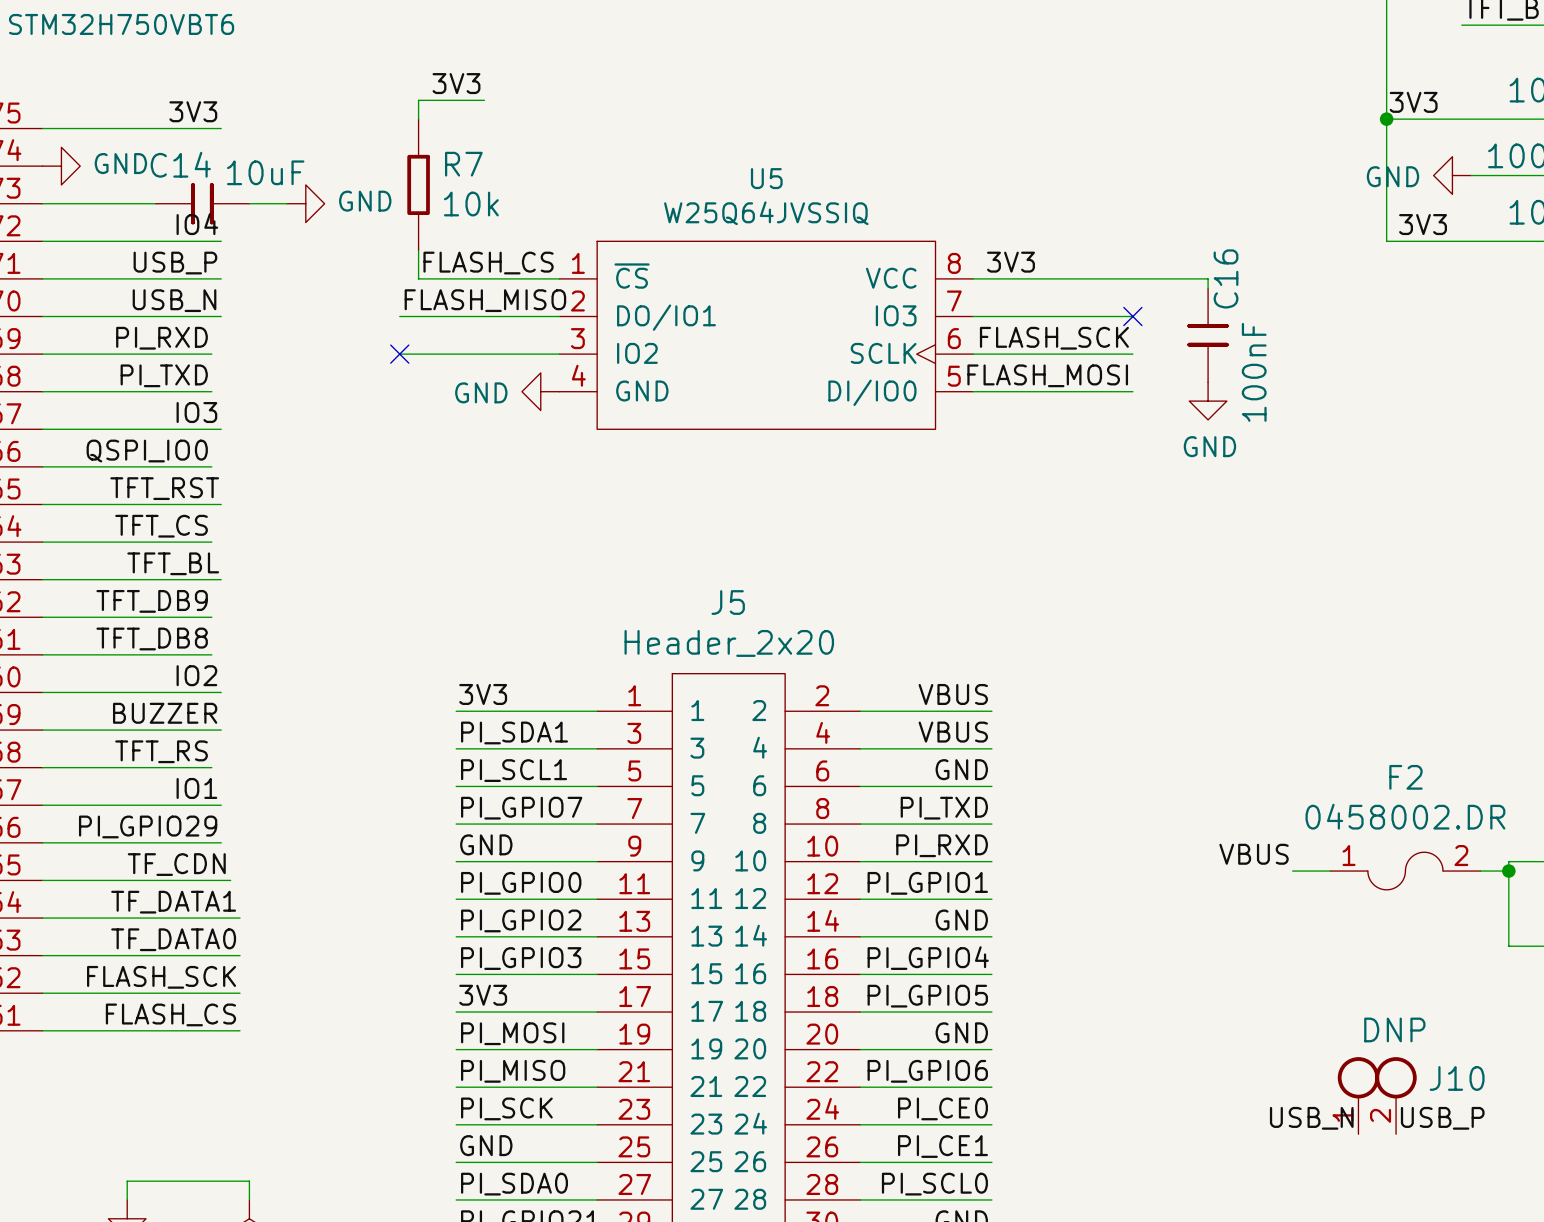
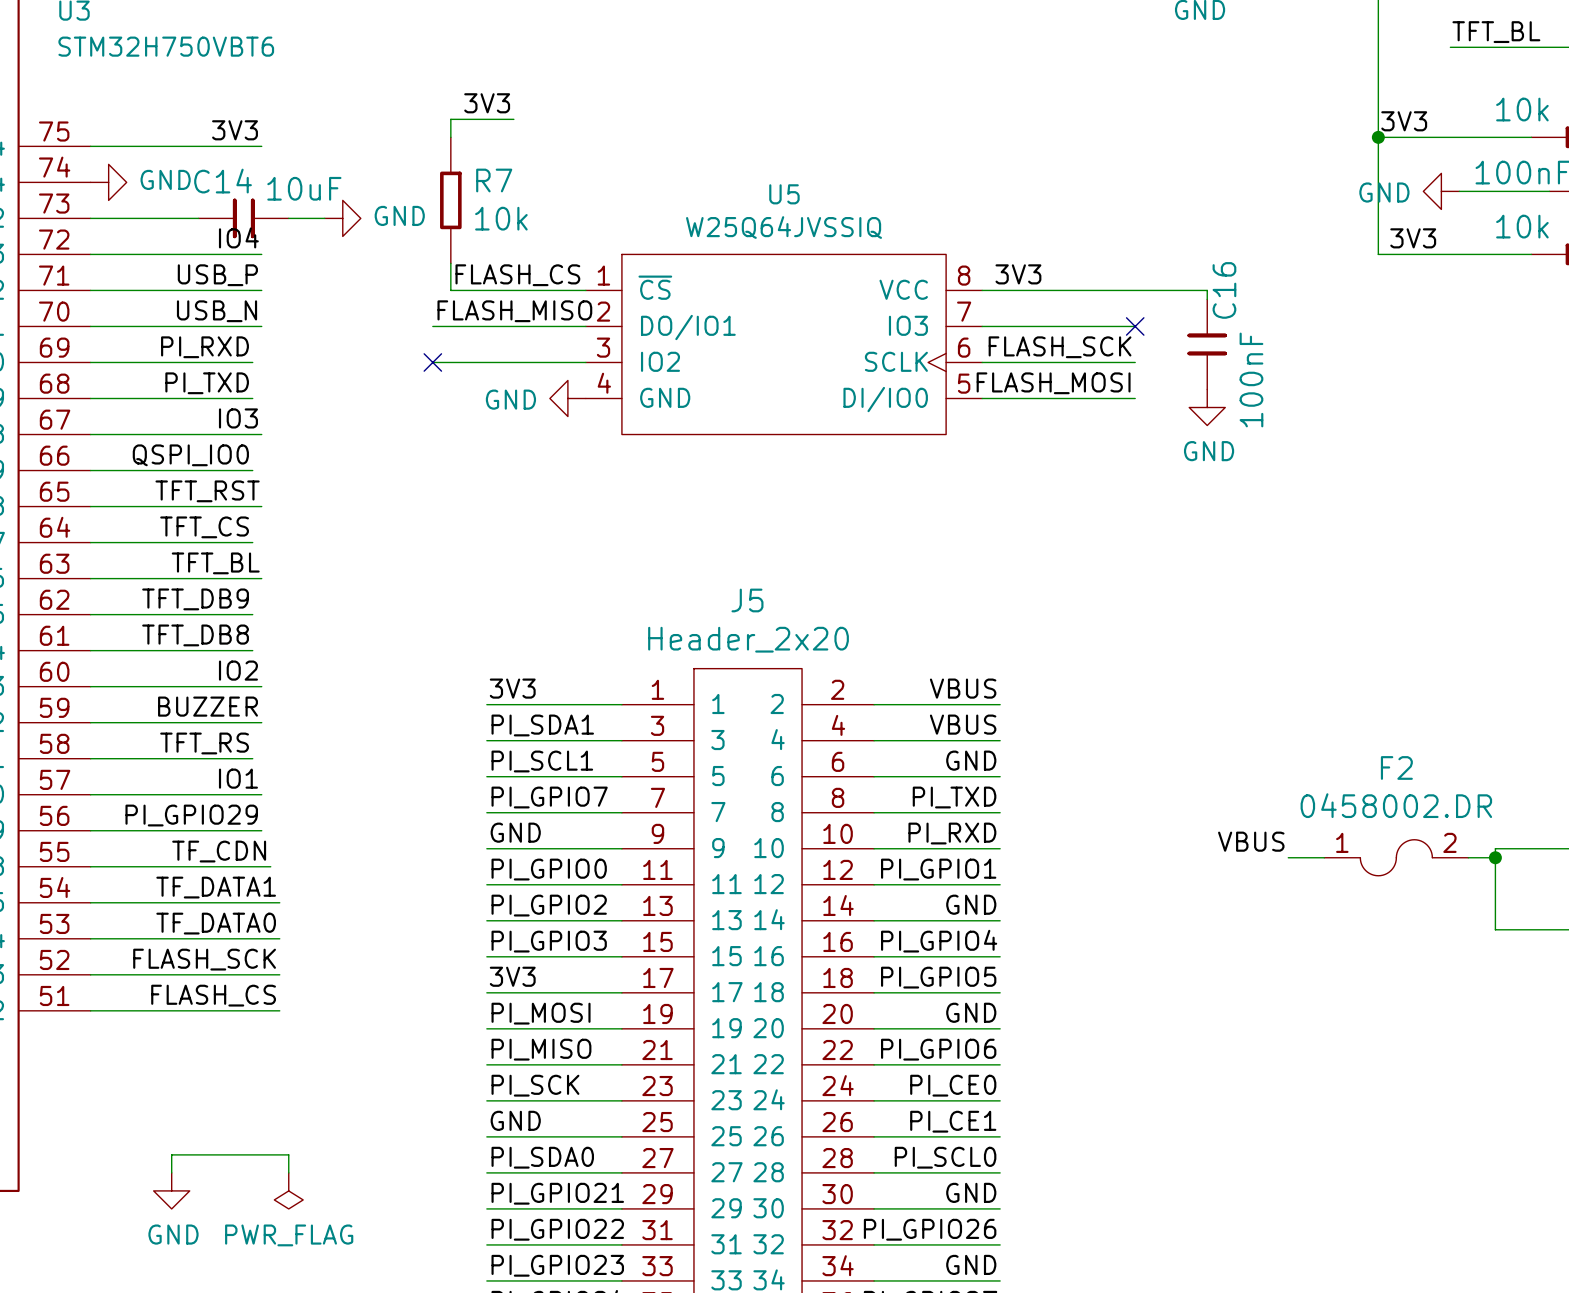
J10: DNP (1377, 1095) -> none
label: USB_N (1311, 1118) -> none
label: USB_P (1442, 1118) -> none

